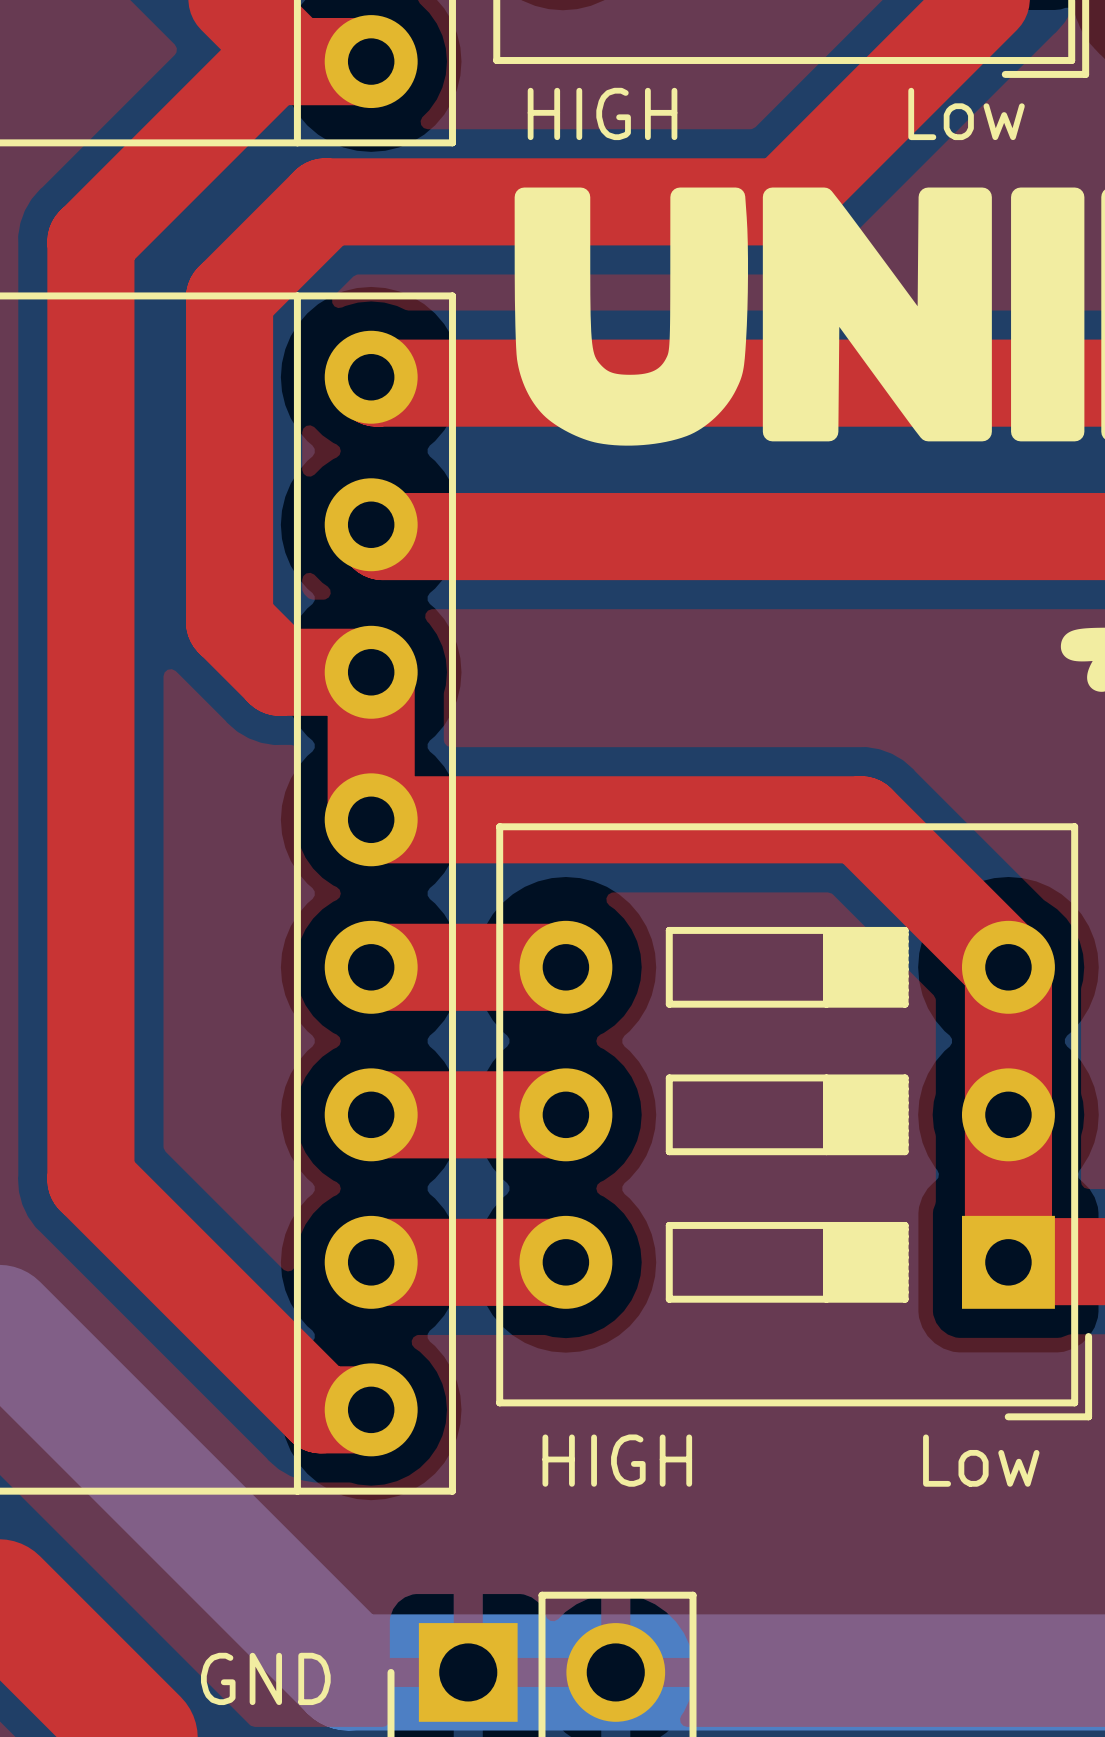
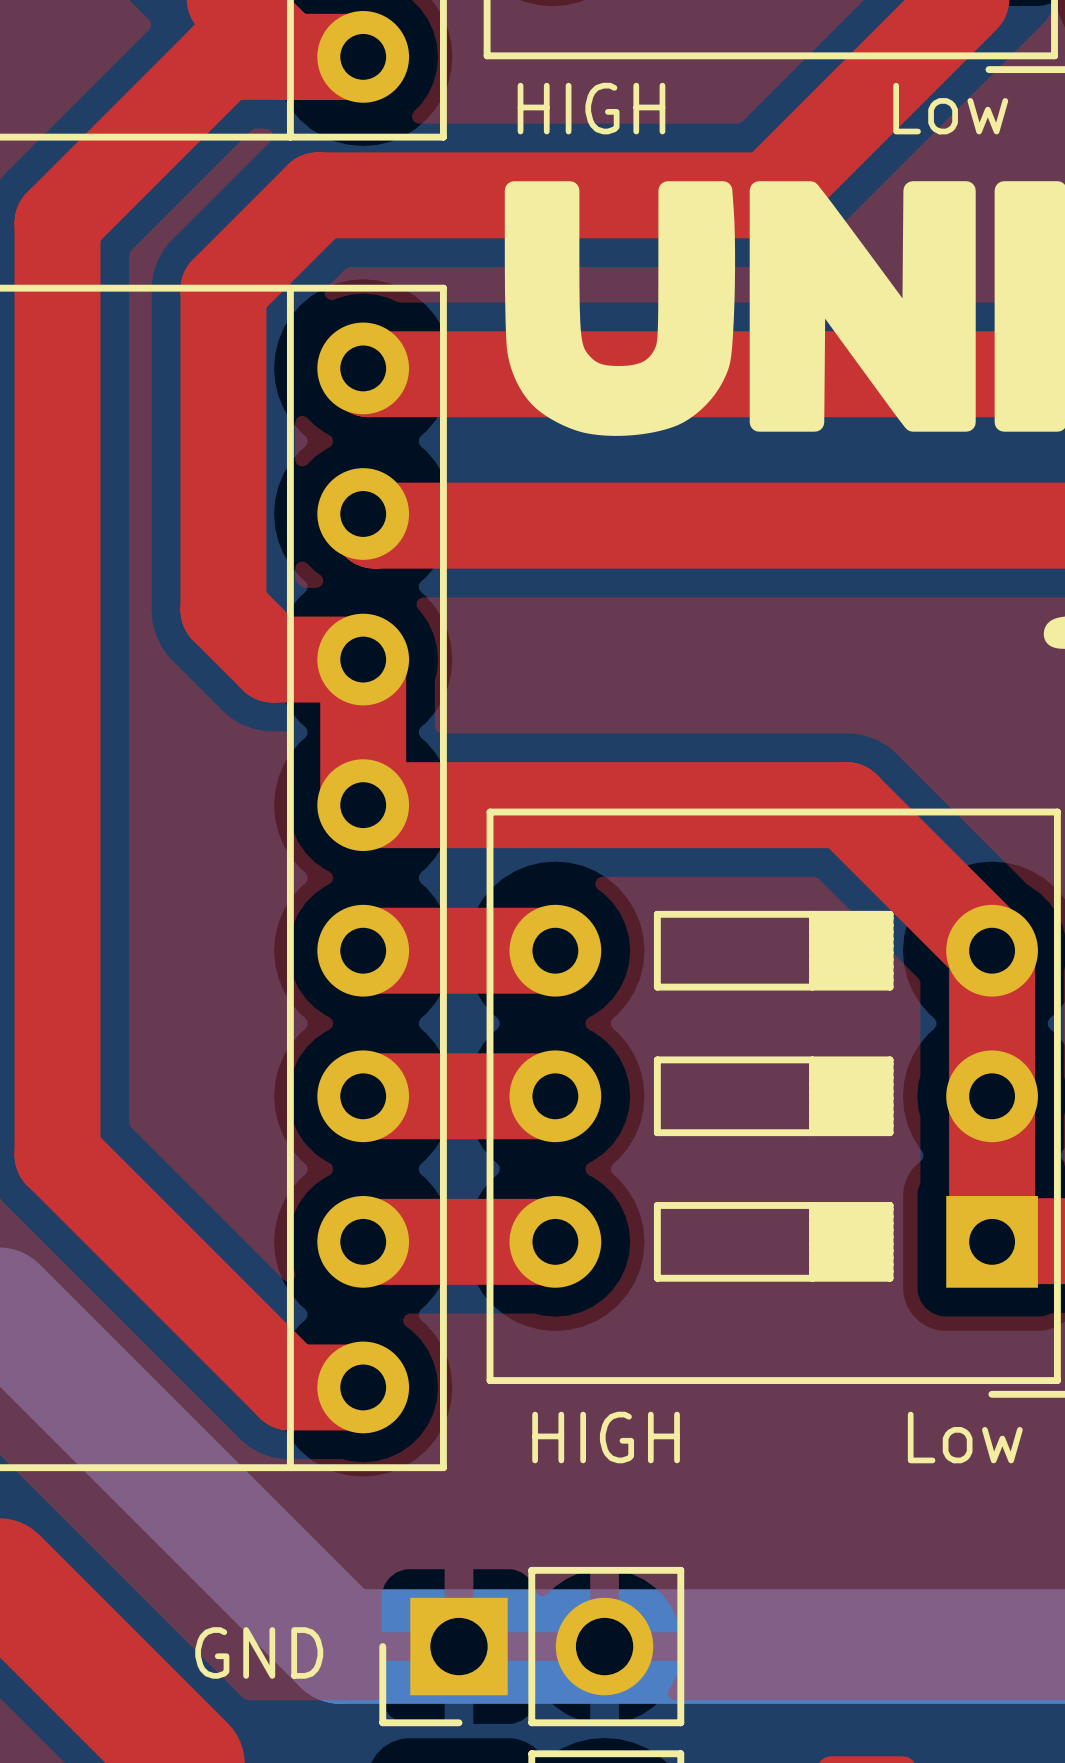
top track: (270, 61) (90, 241) (90, 1179) (321, 1409) -> (264, 56) (223, 56) (57, 222) (57, 1155) (289, 1387) (313, 1387)

